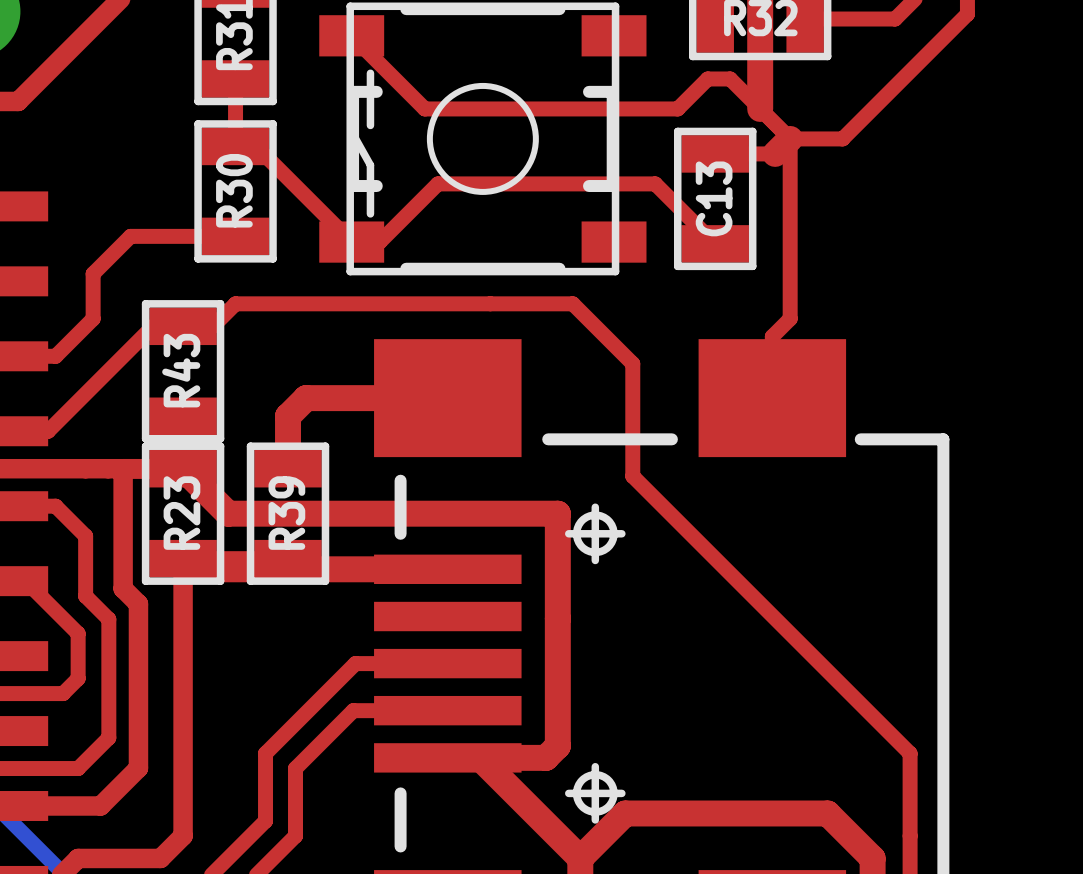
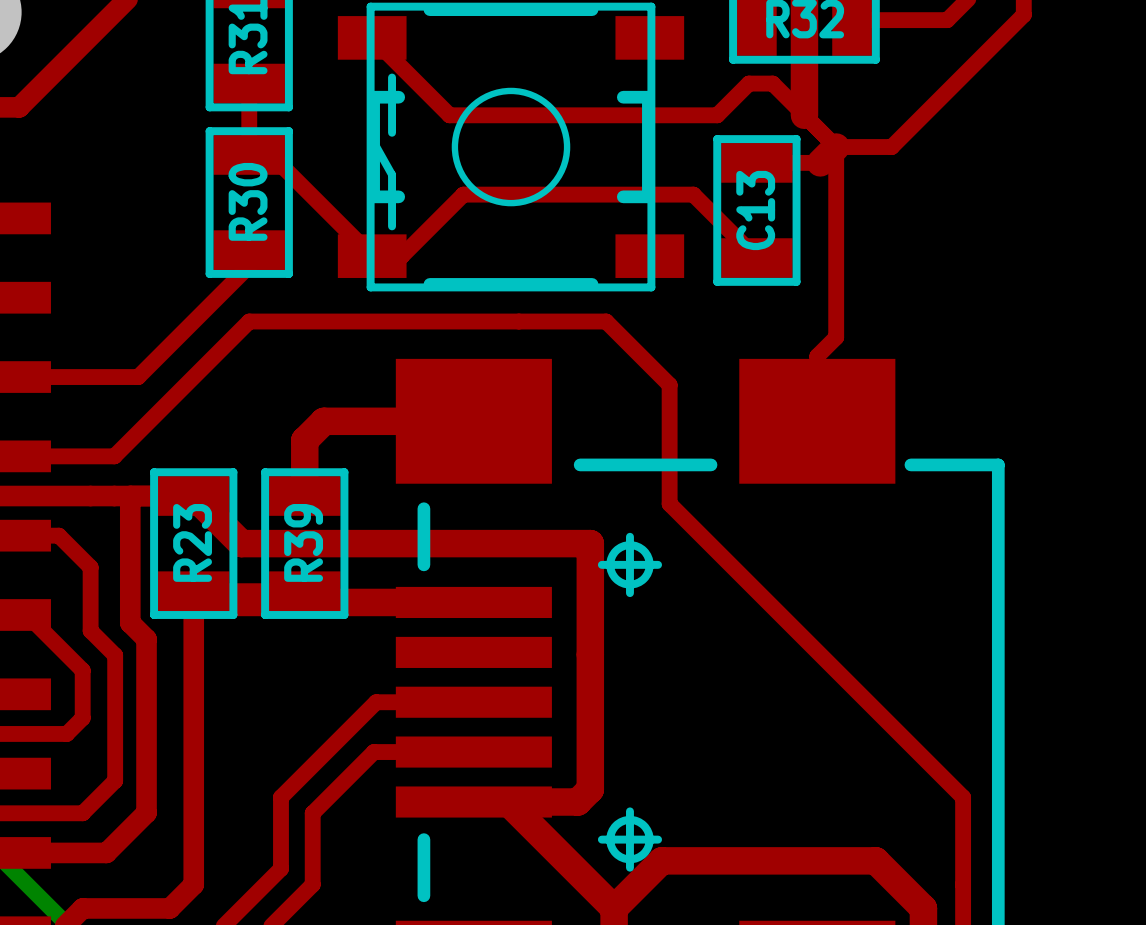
top track: (235, 236) (130, 236) (93, 273) (93, 318) (55, 356) -> (249, 250) (249, 266) (138, 377) (58, 377)
top track: (213, 326) (153, 326) (48, 431) -> (225, 345) (114, 456) (50, 456)
R43: (183, 371) -> none

